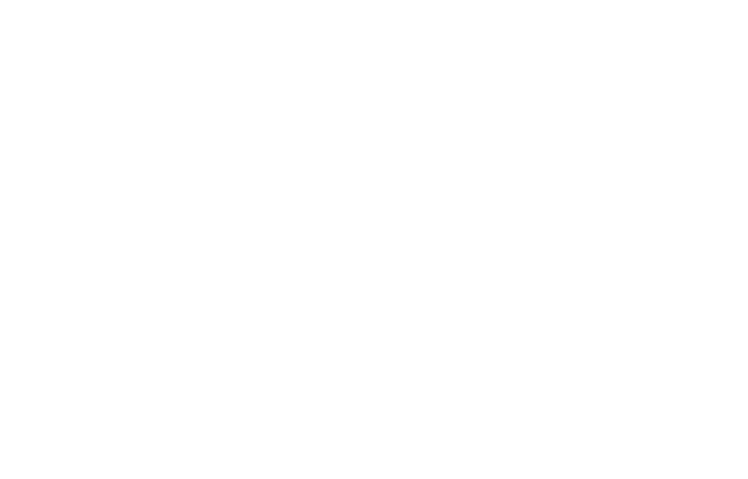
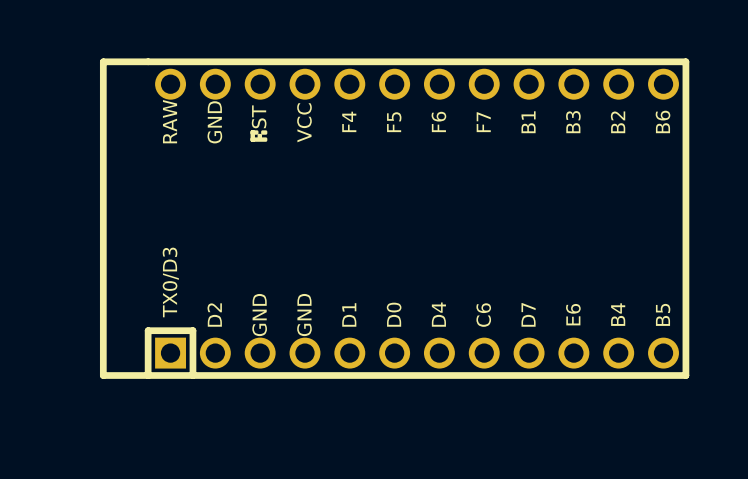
part: none -> (394, 218)

